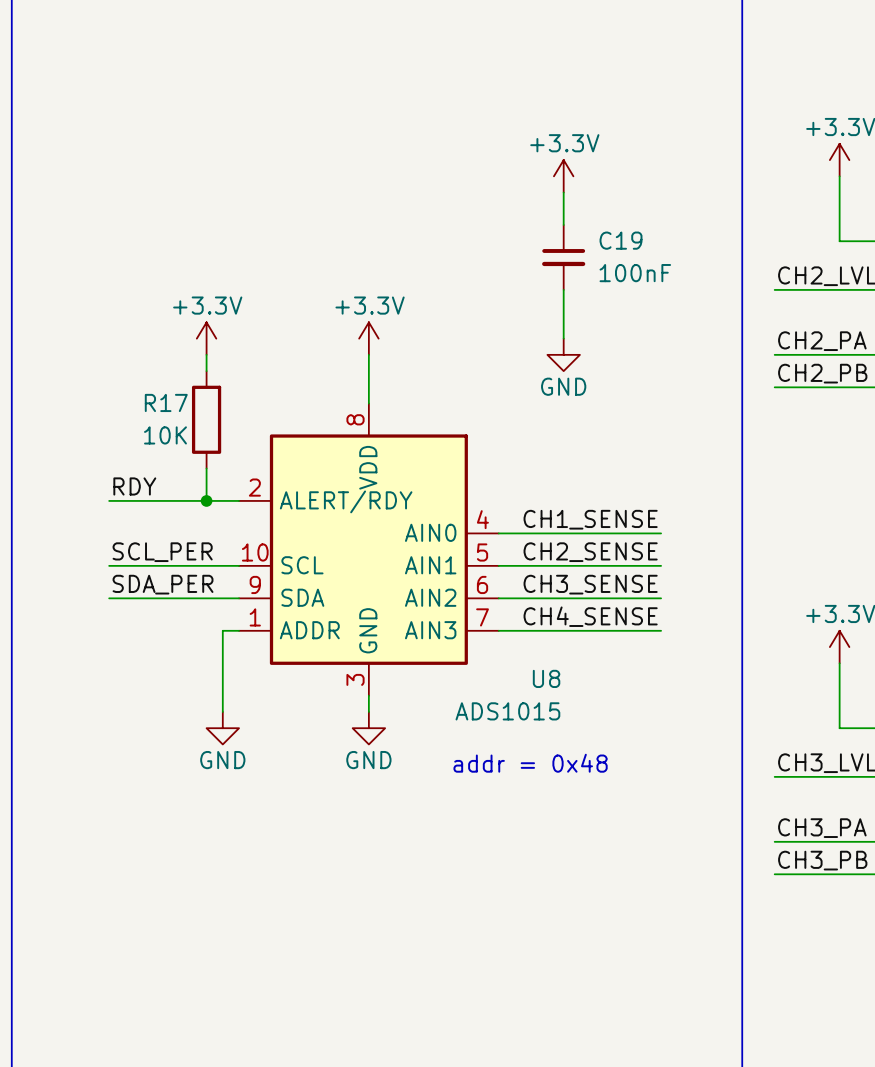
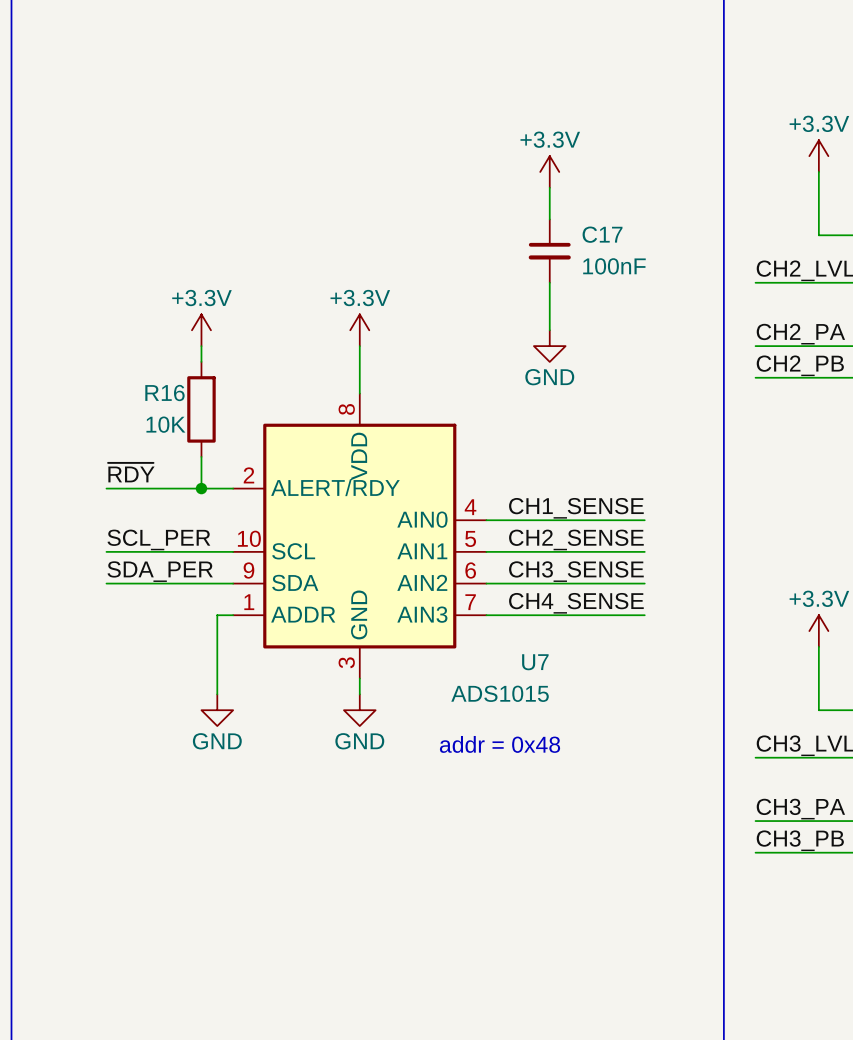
C19 name: C19 (621, 240) -> C17 (602, 234)
R17 name: R17 (166, 402) -> R16 (164, 393)
label: RDY (134, 486) -> ~{RDY} (131, 472)
U8 name: U8 (546, 678) -> U7 (535, 662)

